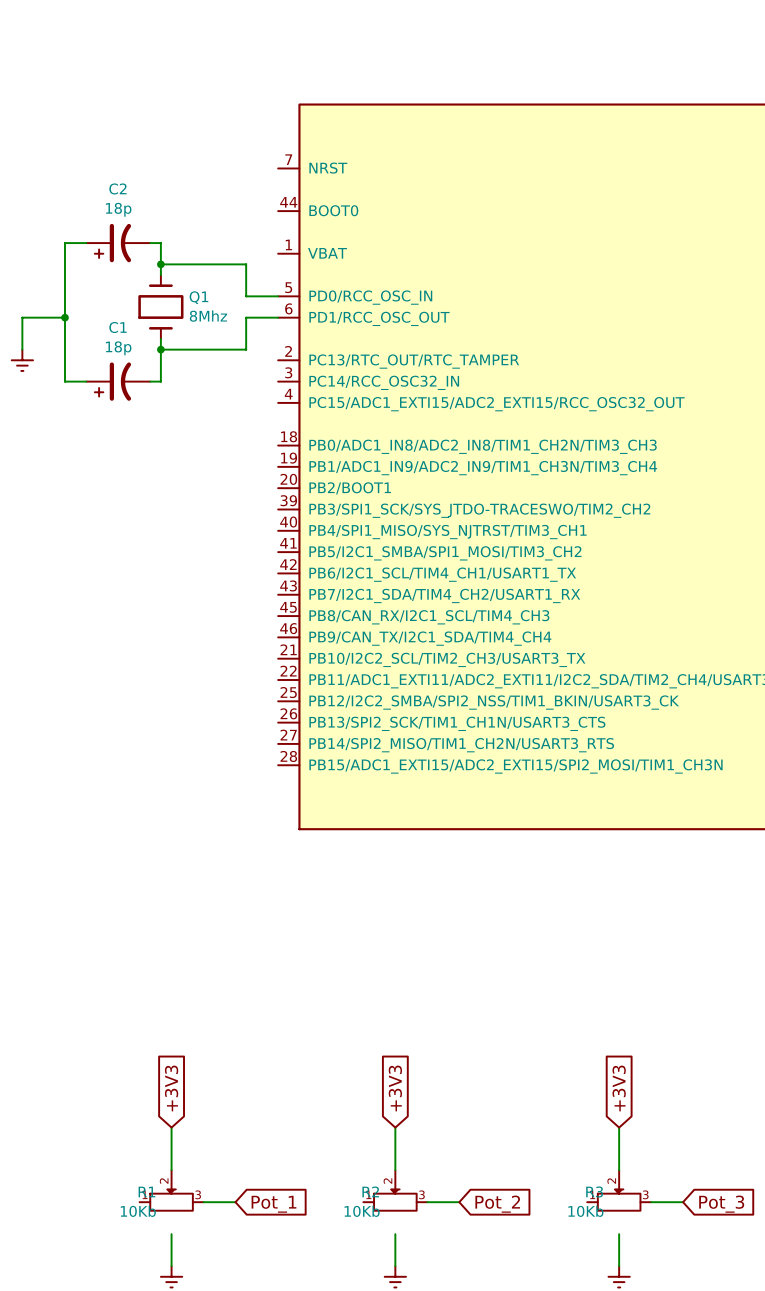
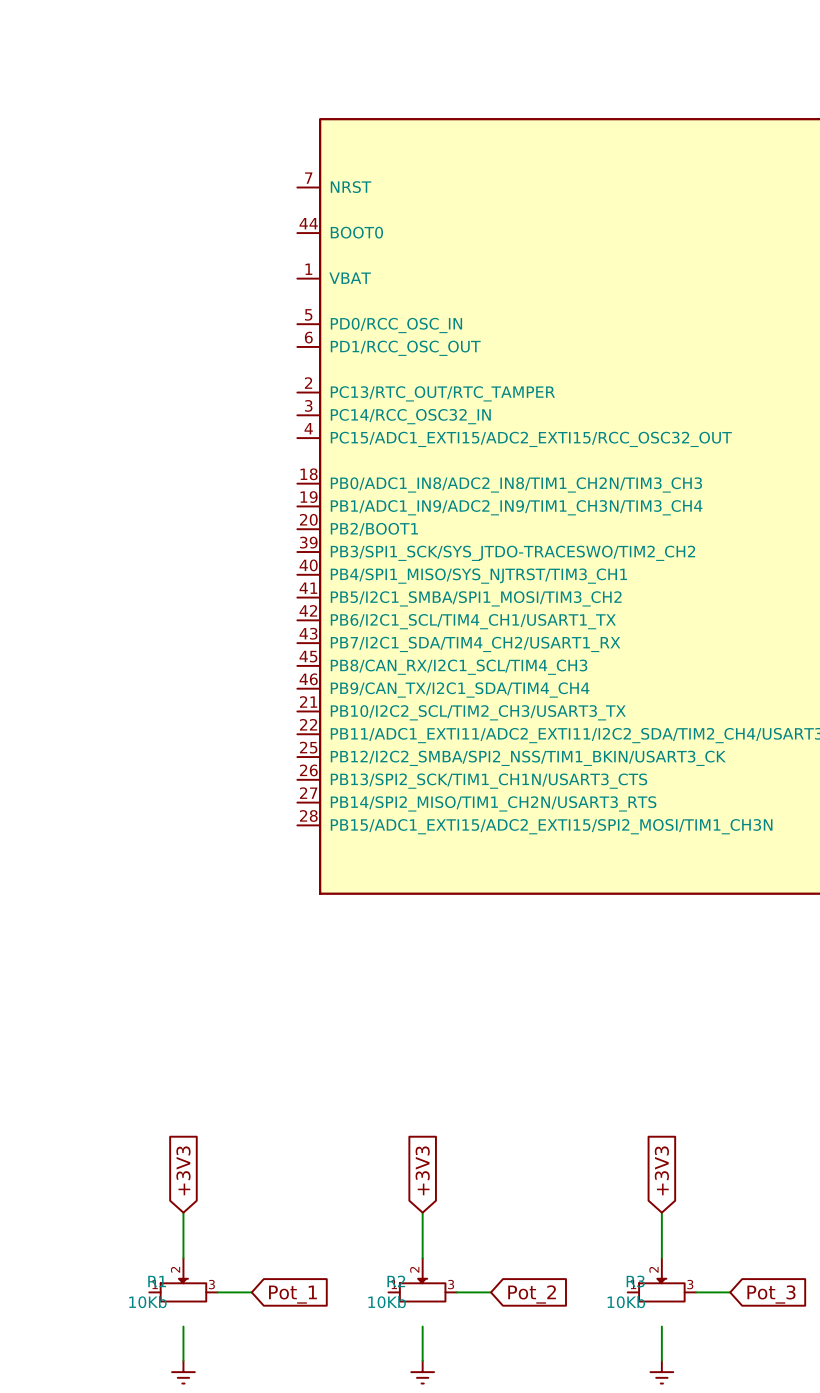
wire: (86, 243) (64, 243) (64, 381) (86, 381) -> none
C2: 18p (118, 243) -> none
wire: (150, 243) (160, 243) (160, 275) -> none
wire: (160, 264) (246, 264) (246, 296) (278, 296) -> none
junction: (160, 264) -> none
Q1: 8Mhz (160, 307) -> none
wire: (64, 317) (22, 317) (22, 349) -> none
junction: (64, 317) -> none
wire: (278, 317) (246, 317) (246, 349) (160, 349) -> none
wire: (160, 338) (160, 381) (150, 381) -> none
junction: (160, 349) -> none
power symbol: (22, 360) -> none
C1: 18p (118, 381) -> none

